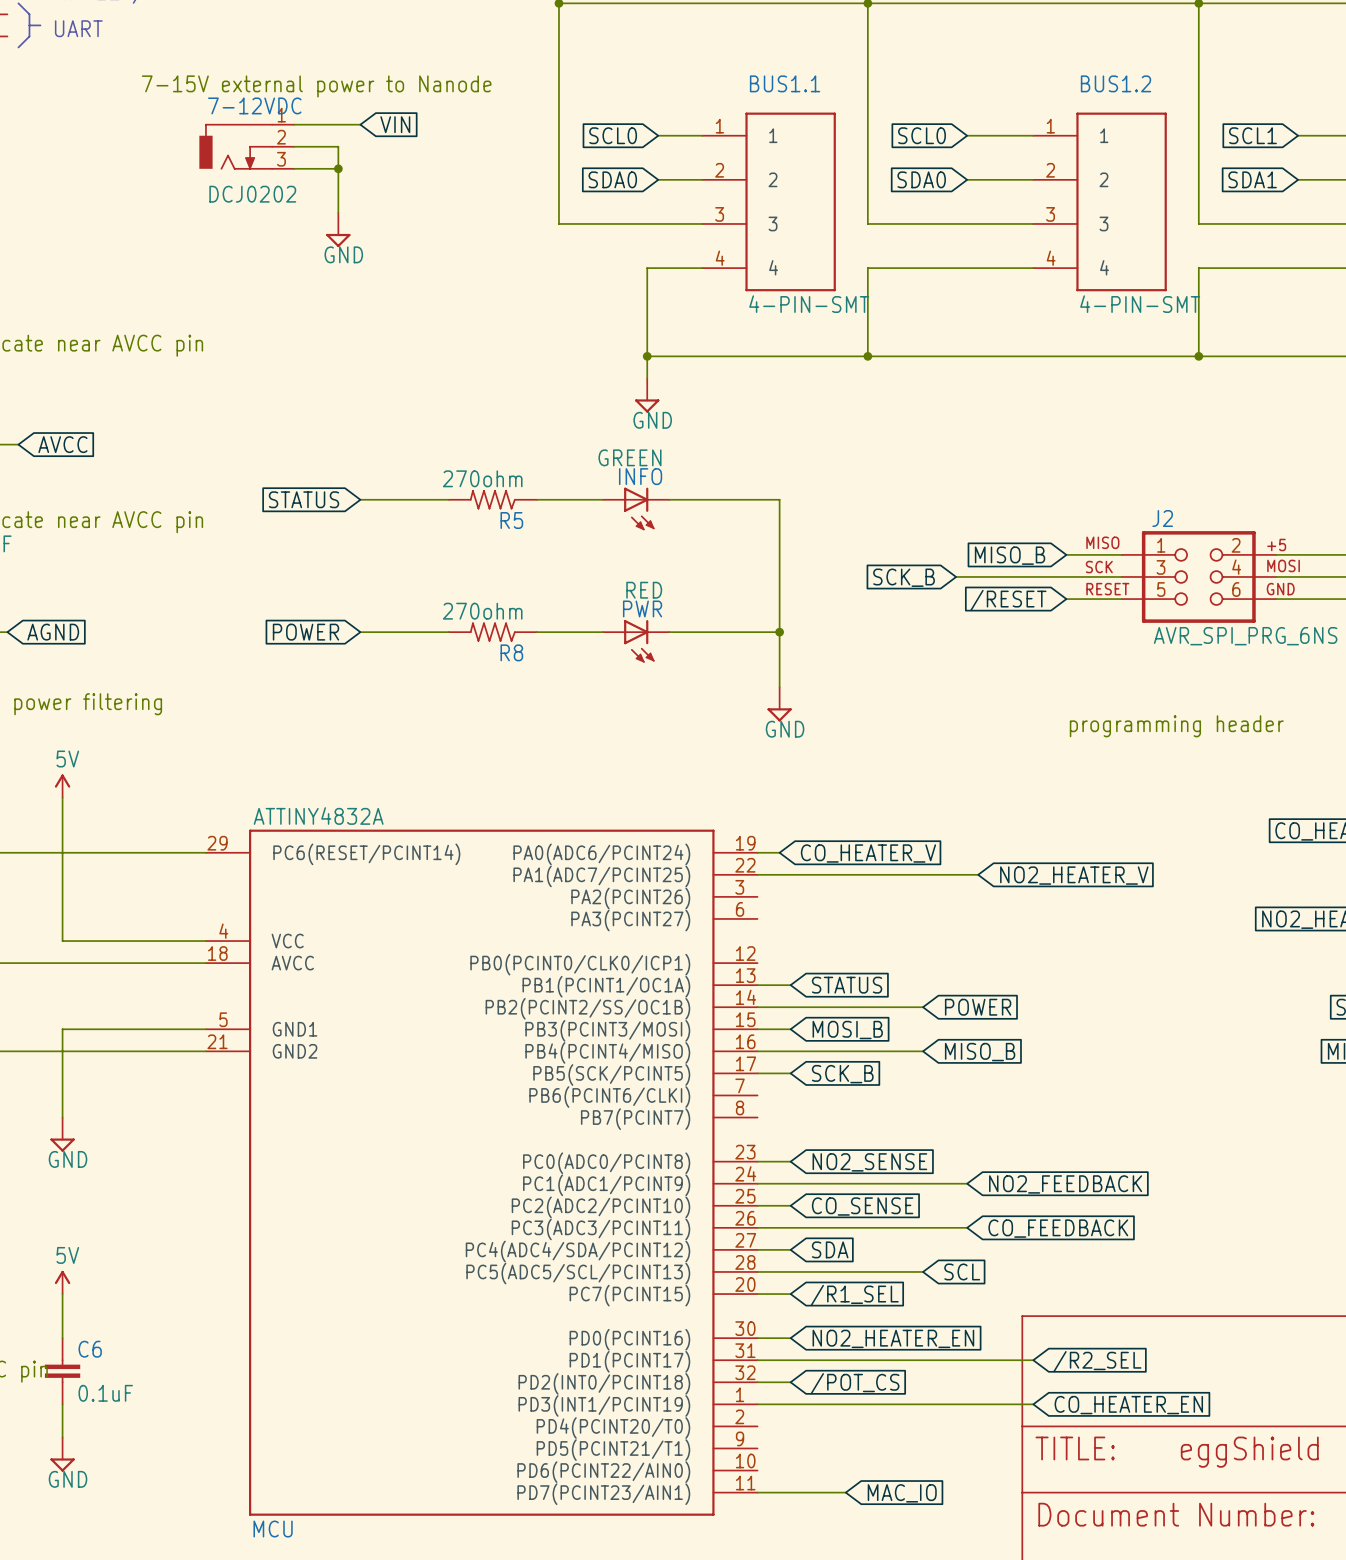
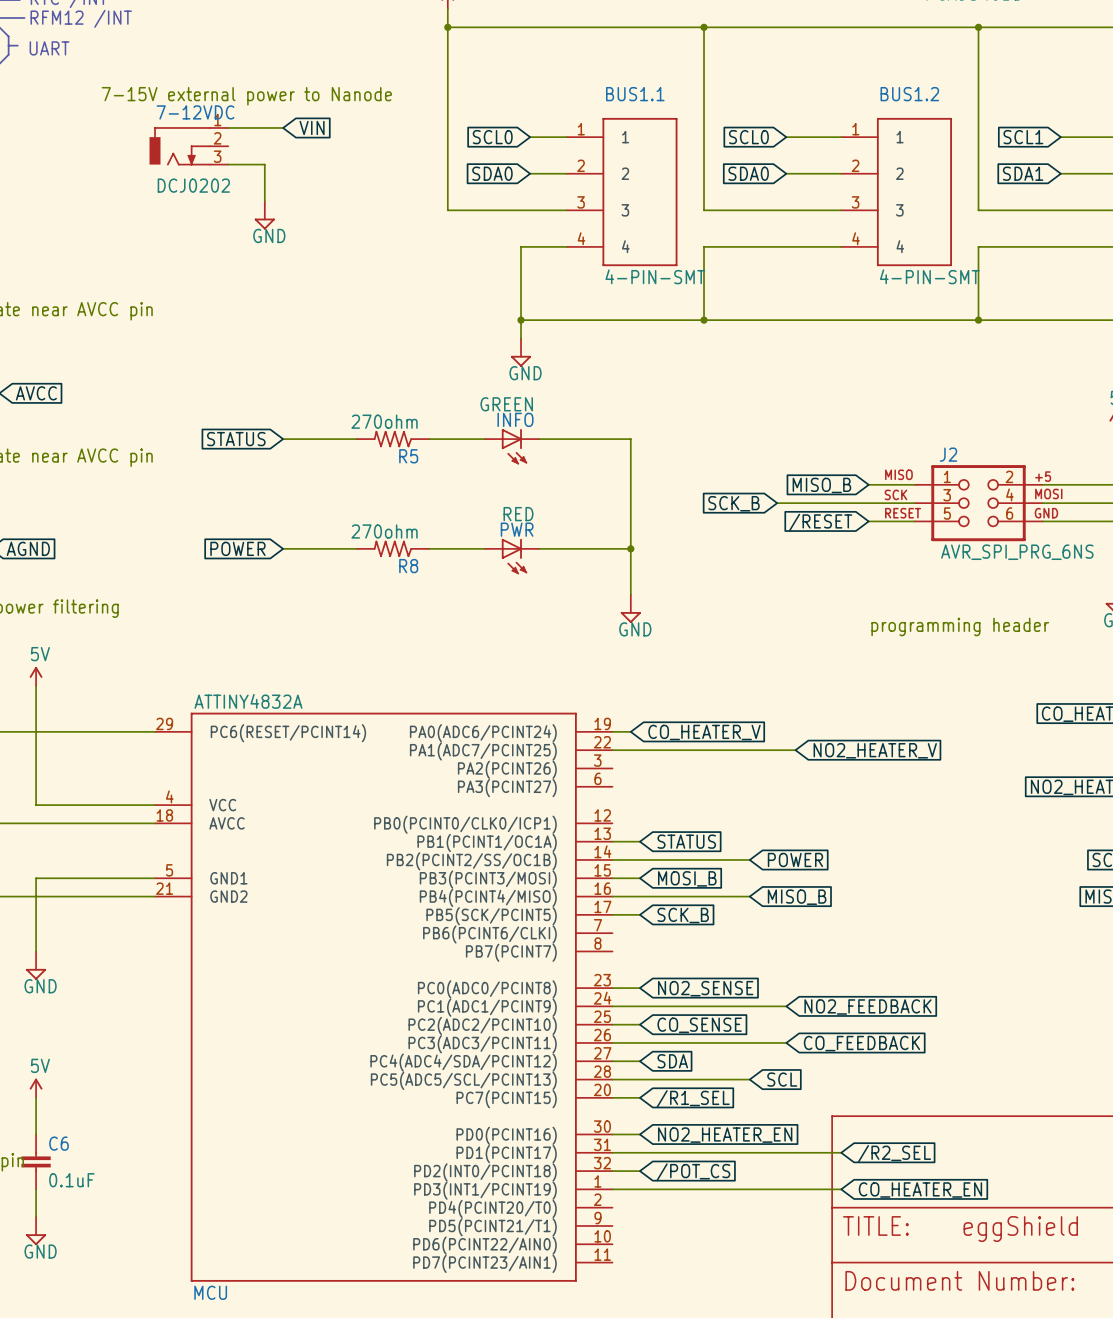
wire: (294, 146) (338, 146) (338, 168) -> none
junction: (338, 168) -> none
wire: (757, 1492) (845, 1492) -> none
global label: MAC_IO (902, 1493) -> none

